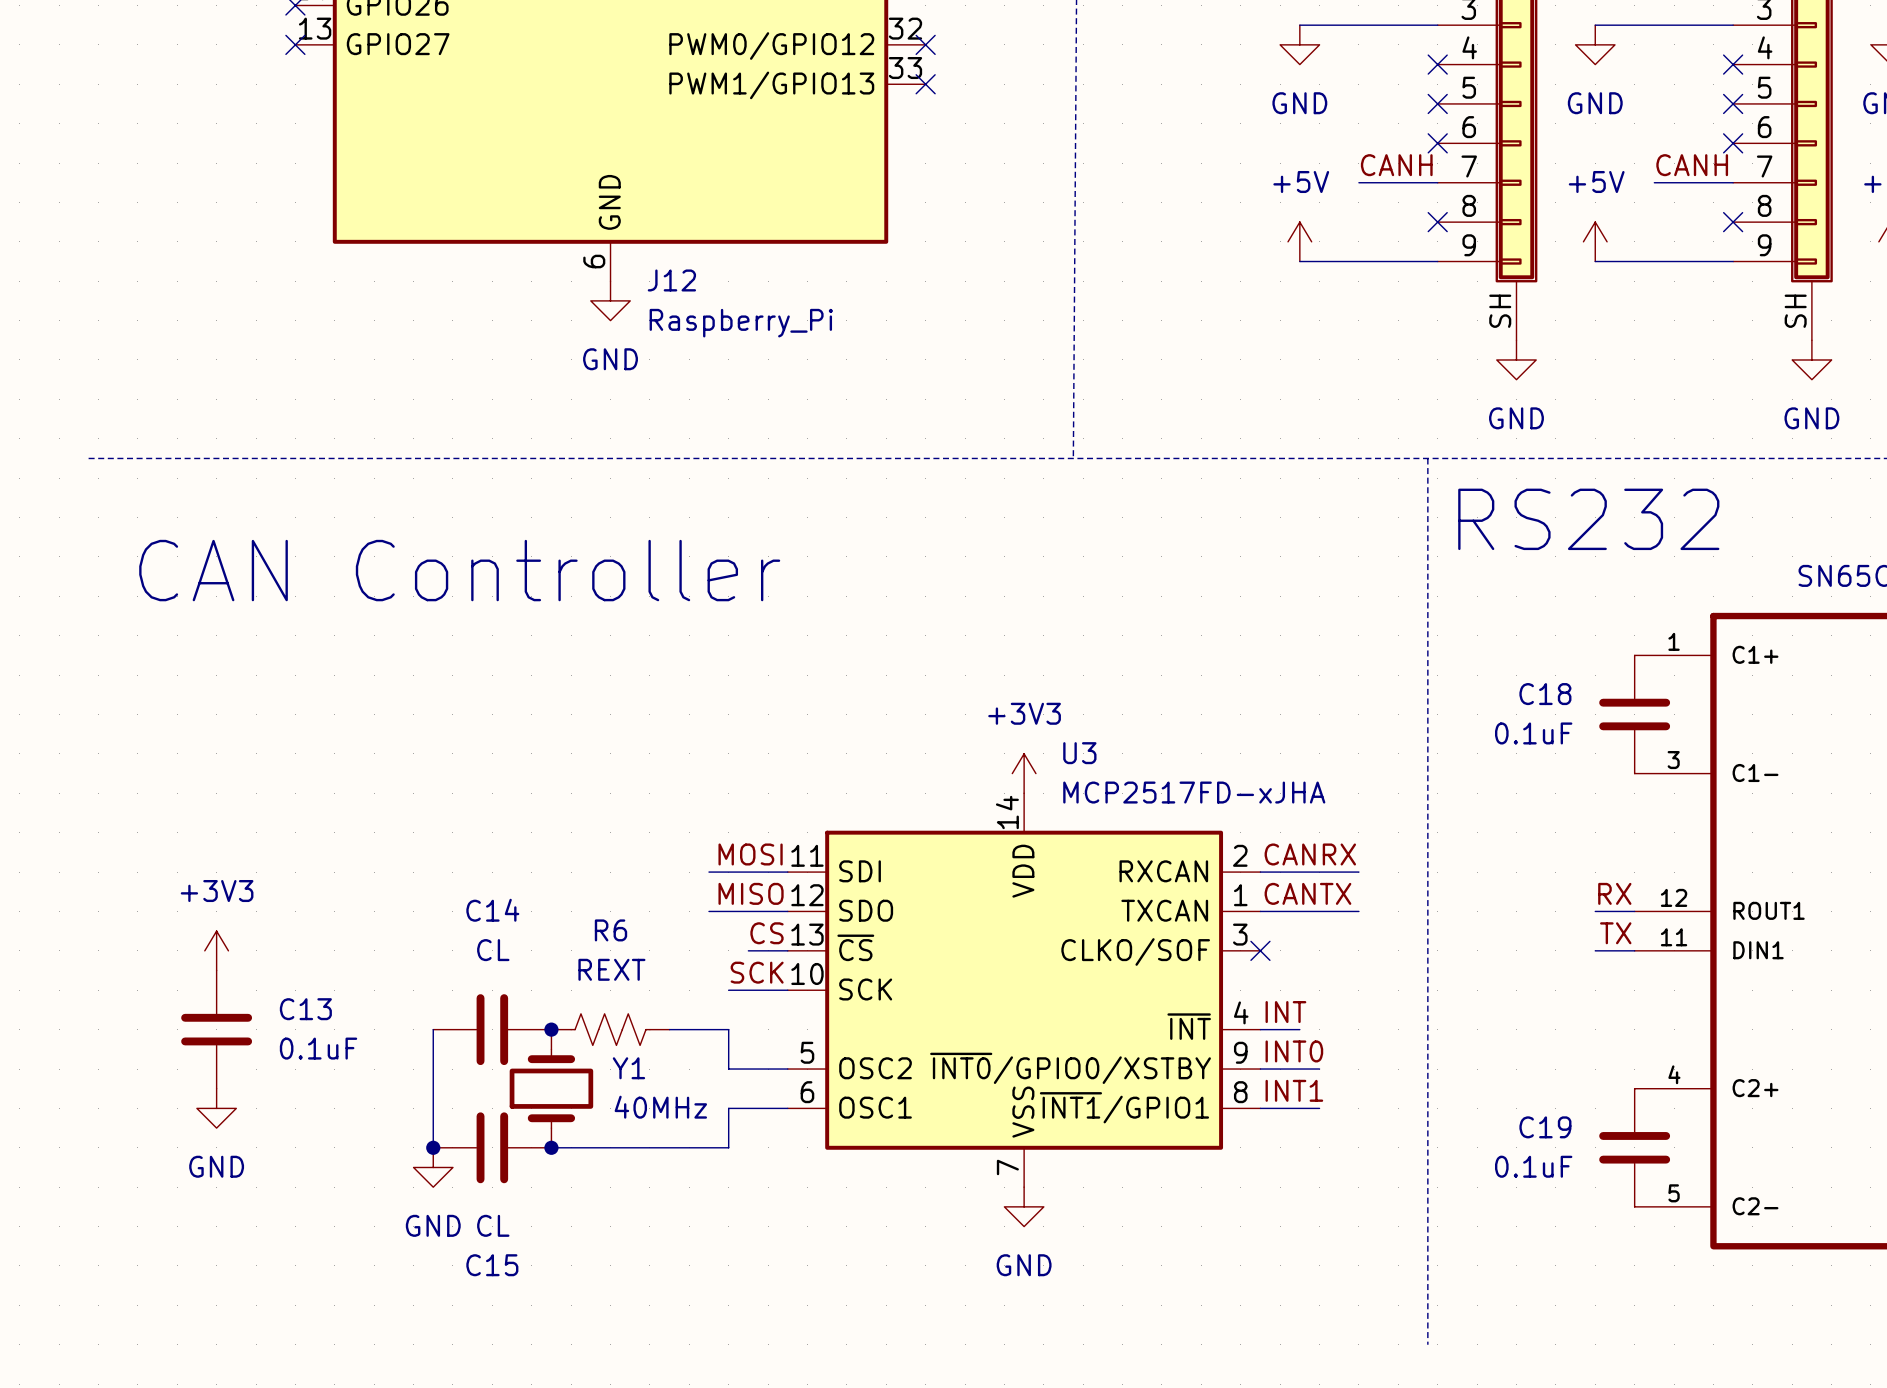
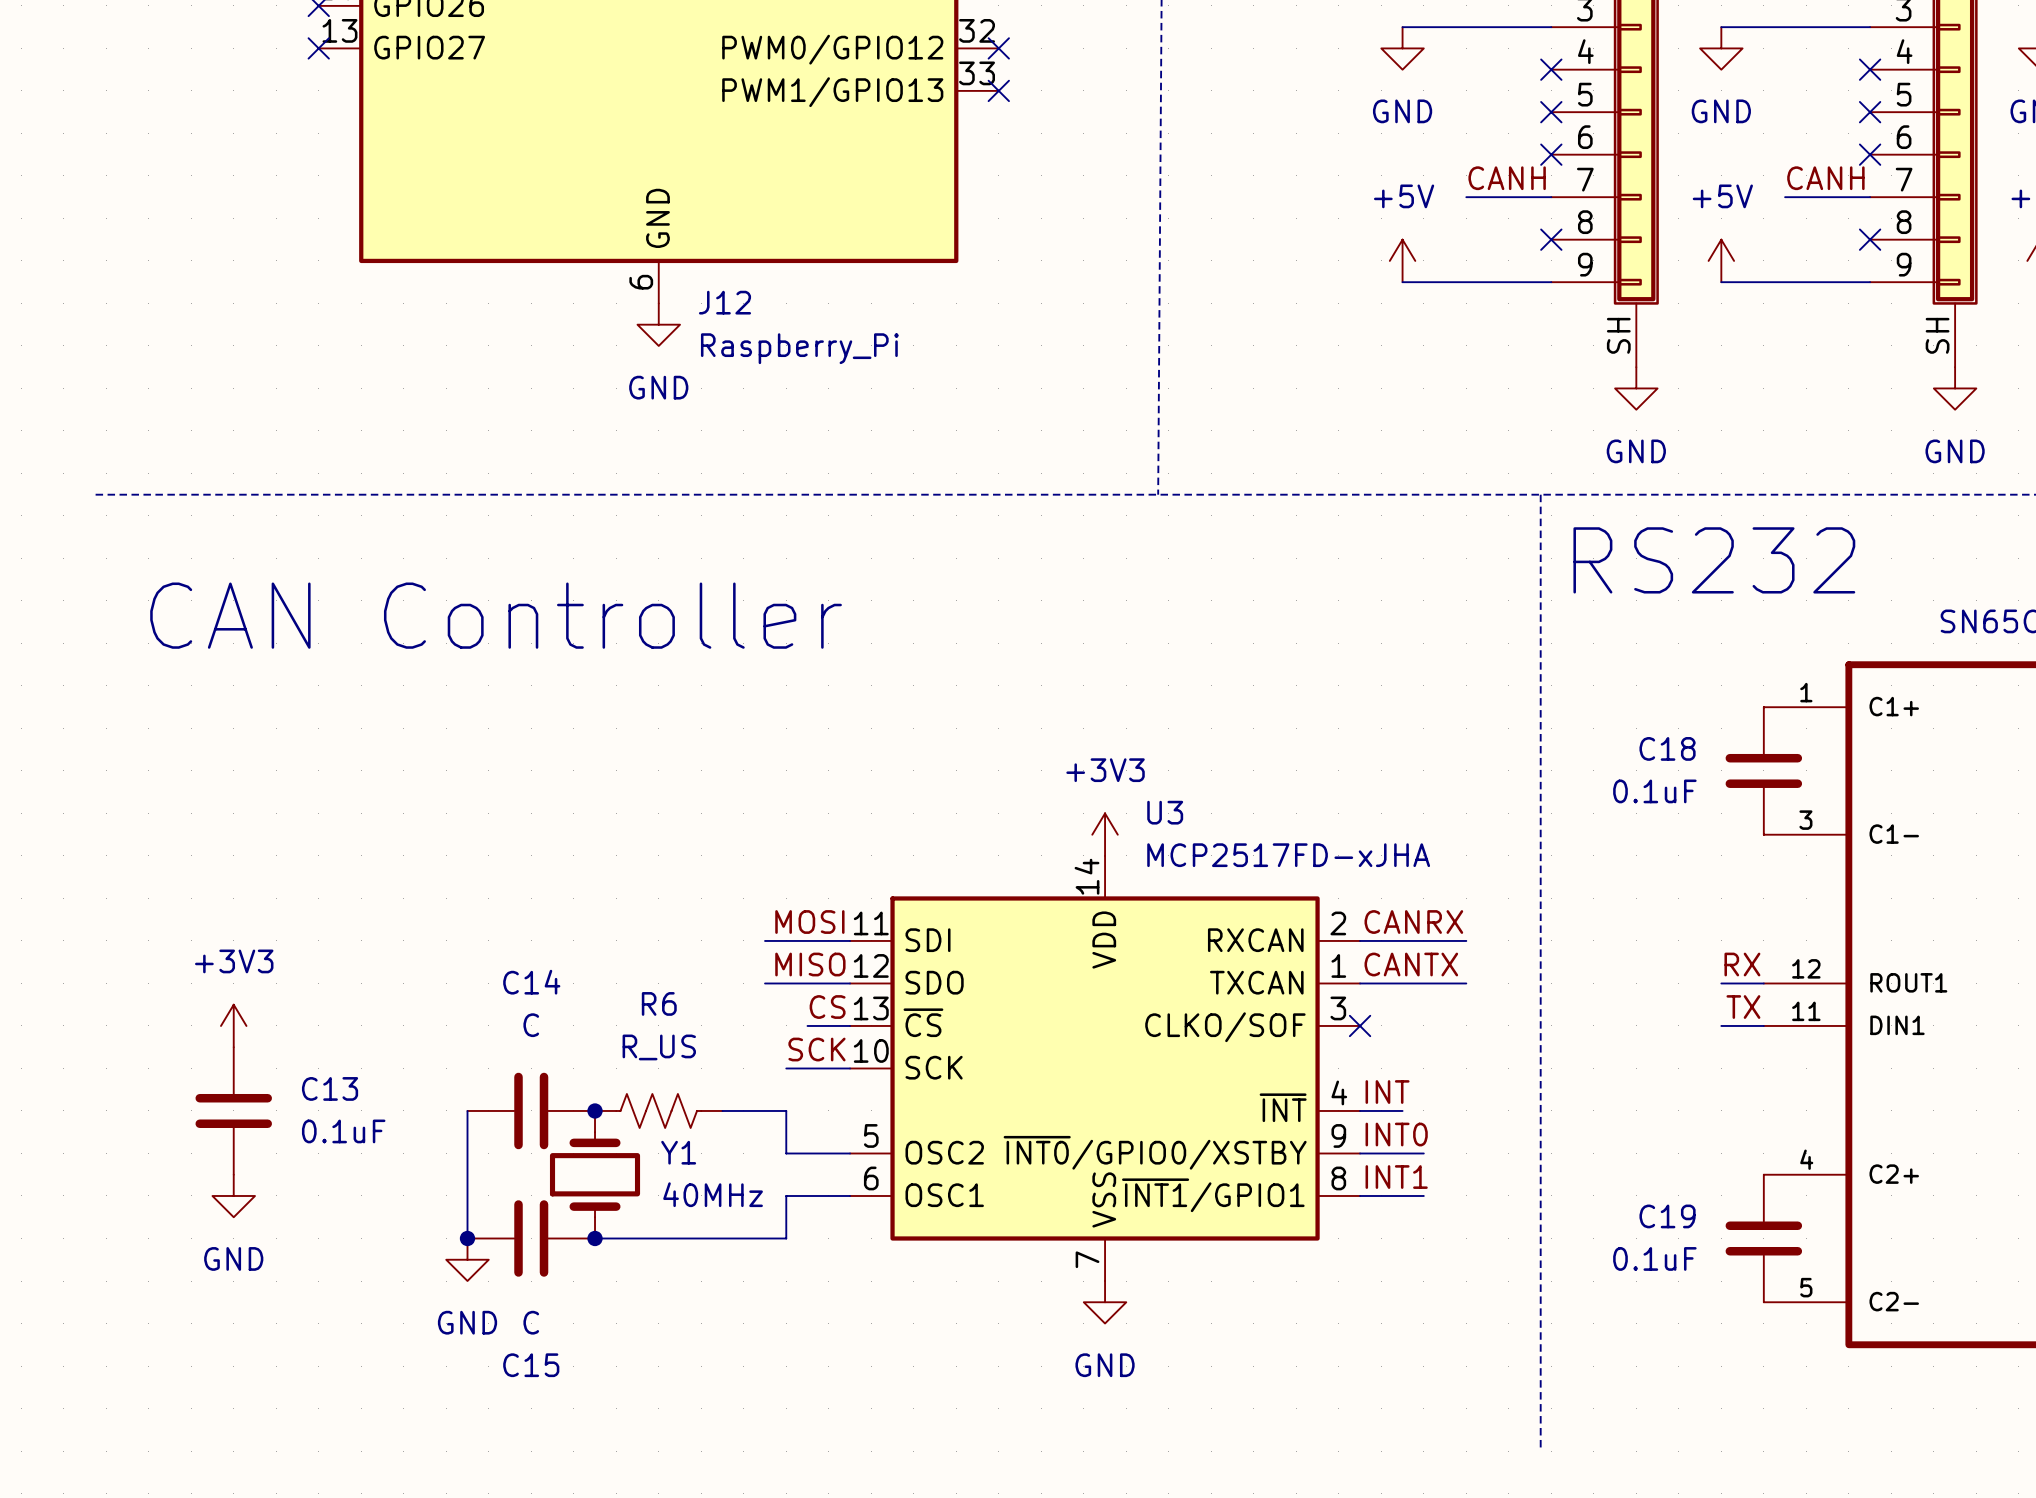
C14 value: CL (493, 950) -> C (531, 1025)
R6 value: REXT (611, 969) -> R_US (659, 1047)
C15 value: CL (493, 1225) -> C (531, 1322)

